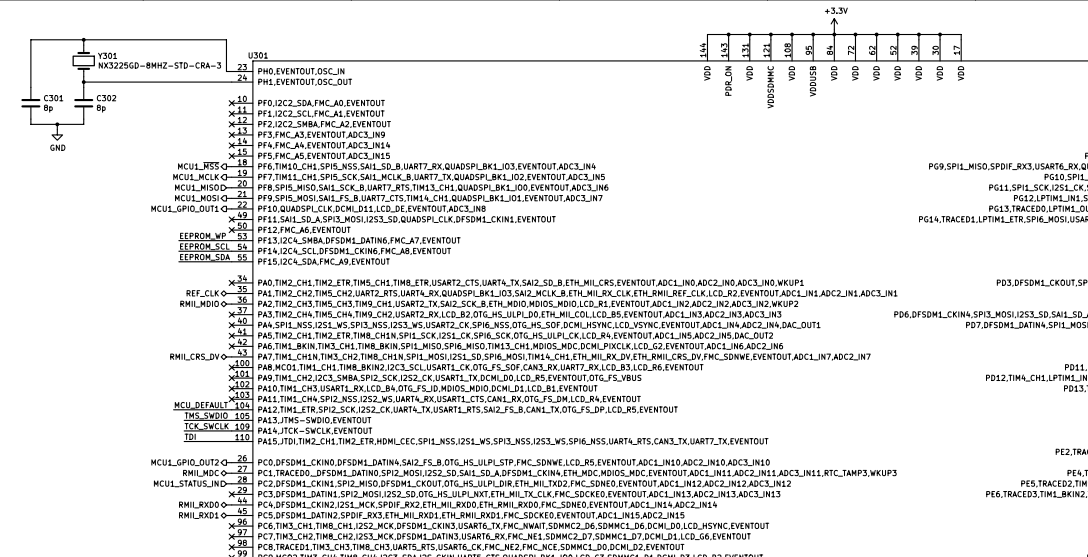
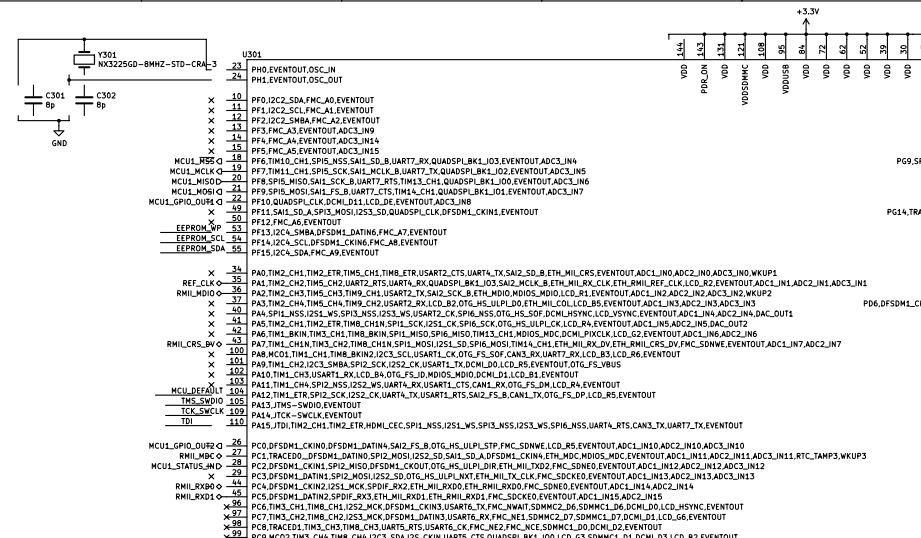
wire: (707, 34) (707, 39) -> (684, 34) (668, 34) (668, 39)
wire: (30, 39) (30, 87) -> (33, 39) (18, 39) (18, 85)
wire: (210, 39) (226, 39) (226, 71) (231, 71) -> (206, 39) (206, 69) (211, 69)
wire: (83, 76) (83, 87) -> (69, 74) (69, 85)
wire: none -> (69, 79) (84, 79)
junction position: (83, 82) -> (69, 79)
wire: (215, 82) (231, 82) -> none
no-connect mark: none -> (211, 100)
no-connect mark: (231, 103) -> none
no-connect mark: none -> (211, 110)
no-connect mark: (231, 113) -> none
wire: (30, 119) (30, 124) -> (18, 115) (18, 120) (33, 120)
wire: (83, 119) (83, 124) (67, 124) -> (69, 115) (69, 120)
no-connect mark: none -> (211, 120)
no-connect mark: (231, 124) -> none
no-connect mark: none -> (211, 130)
no-connect mark: (231, 134) -> none
no-connect mark: none -> (211, 140)
no-connect mark: (231, 145) -> none
no-connect mark: none -> (211, 151)
no-connect mark: (231, 156) -> none
wire: (226, 166) (231, 166) -> (206, 161) (211, 161)
wire: (226, 198) (231, 198) -> (206, 191) (211, 191)
wire: (226, 208) (231, 208) -> (206, 201) (211, 201)
no-connect mark: none -> (211, 212)
no-connect mark: (231, 219) -> none
no-connect mark: none -> (211, 222)
no-connect mark: (231, 230) -> none
wire: (215, 240) (231, 240) -> (160, 232) (175, 232)
wire: (215, 251) (231, 251) -> (160, 242) (175, 242)
wire: (215, 261) (231, 261) -> (160, 252) (175, 252)
no-connect mark position: (231, 282) -> (211, 273)
no-connect mark: none -> (211, 303)
no-connect mark: (231, 314) -> none
no-connect mark: none -> (211, 313)
no-connect mark: (231, 325) -> none
no-connect mark: none -> (211, 323)
no-connect mark: (231, 335) -> none
no-connect mark: none -> (211, 334)
no-connect mark: (231, 346) -> none
wire: (226, 356) (231, 356) -> (206, 344) (211, 344)
no-connect mark: none -> (211, 354)
no-connect mark: (231, 367) -> none
no-connect mark: none -> (211, 364)
no-connect mark: (231, 378) -> none
no-connect mark: none -> (211, 374)
no-connect mark: (231, 388) -> none
no-connect mark: none -> (211, 384)
no-connect mark: (231, 399) -> none
wire: (215, 409) (231, 409) -> (155, 395) (170, 395)
wire: (215, 420) (231, 420) -> (165, 405) (180, 405)
wire: (215, 430) (231, 430) -> (165, 415) (180, 415)
wire: (215, 441) (231, 441) -> (165, 425) (180, 425)
wire: (226, 462) (231, 462) -> (206, 445) (211, 445)
wire: (226, 473) (231, 473) -> (206, 456) (211, 456)
wire: (226, 483) (231, 483) -> (206, 466) (211, 466)
no-connect mark position: (231, 494) -> (211, 476)
wire: (226, 504) (231, 504) -> (206, 486) (211, 486)

